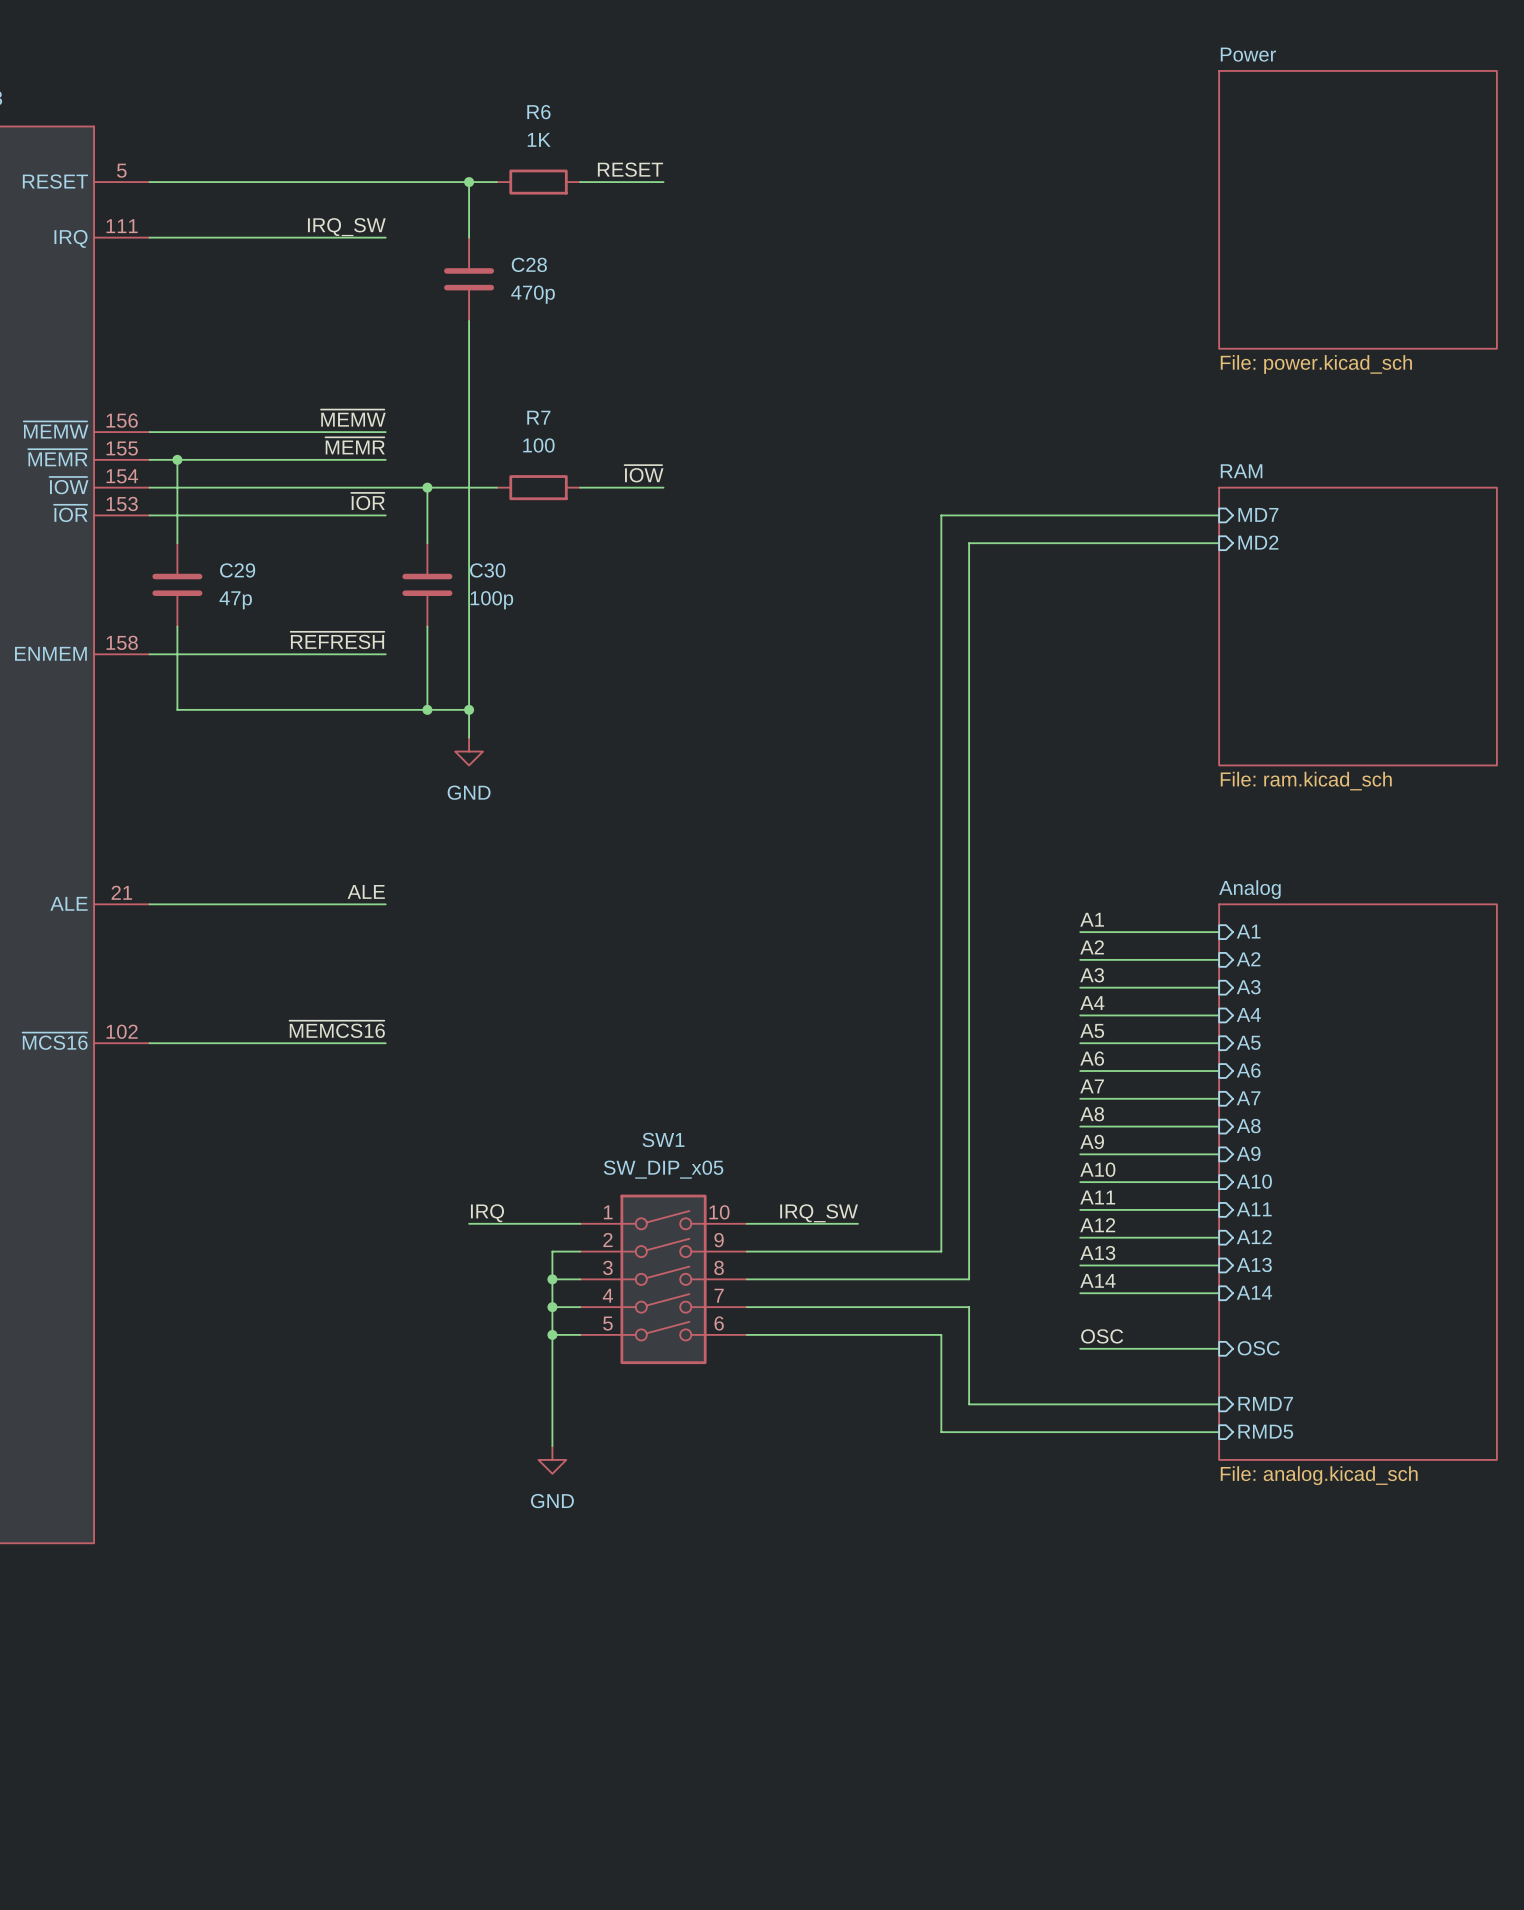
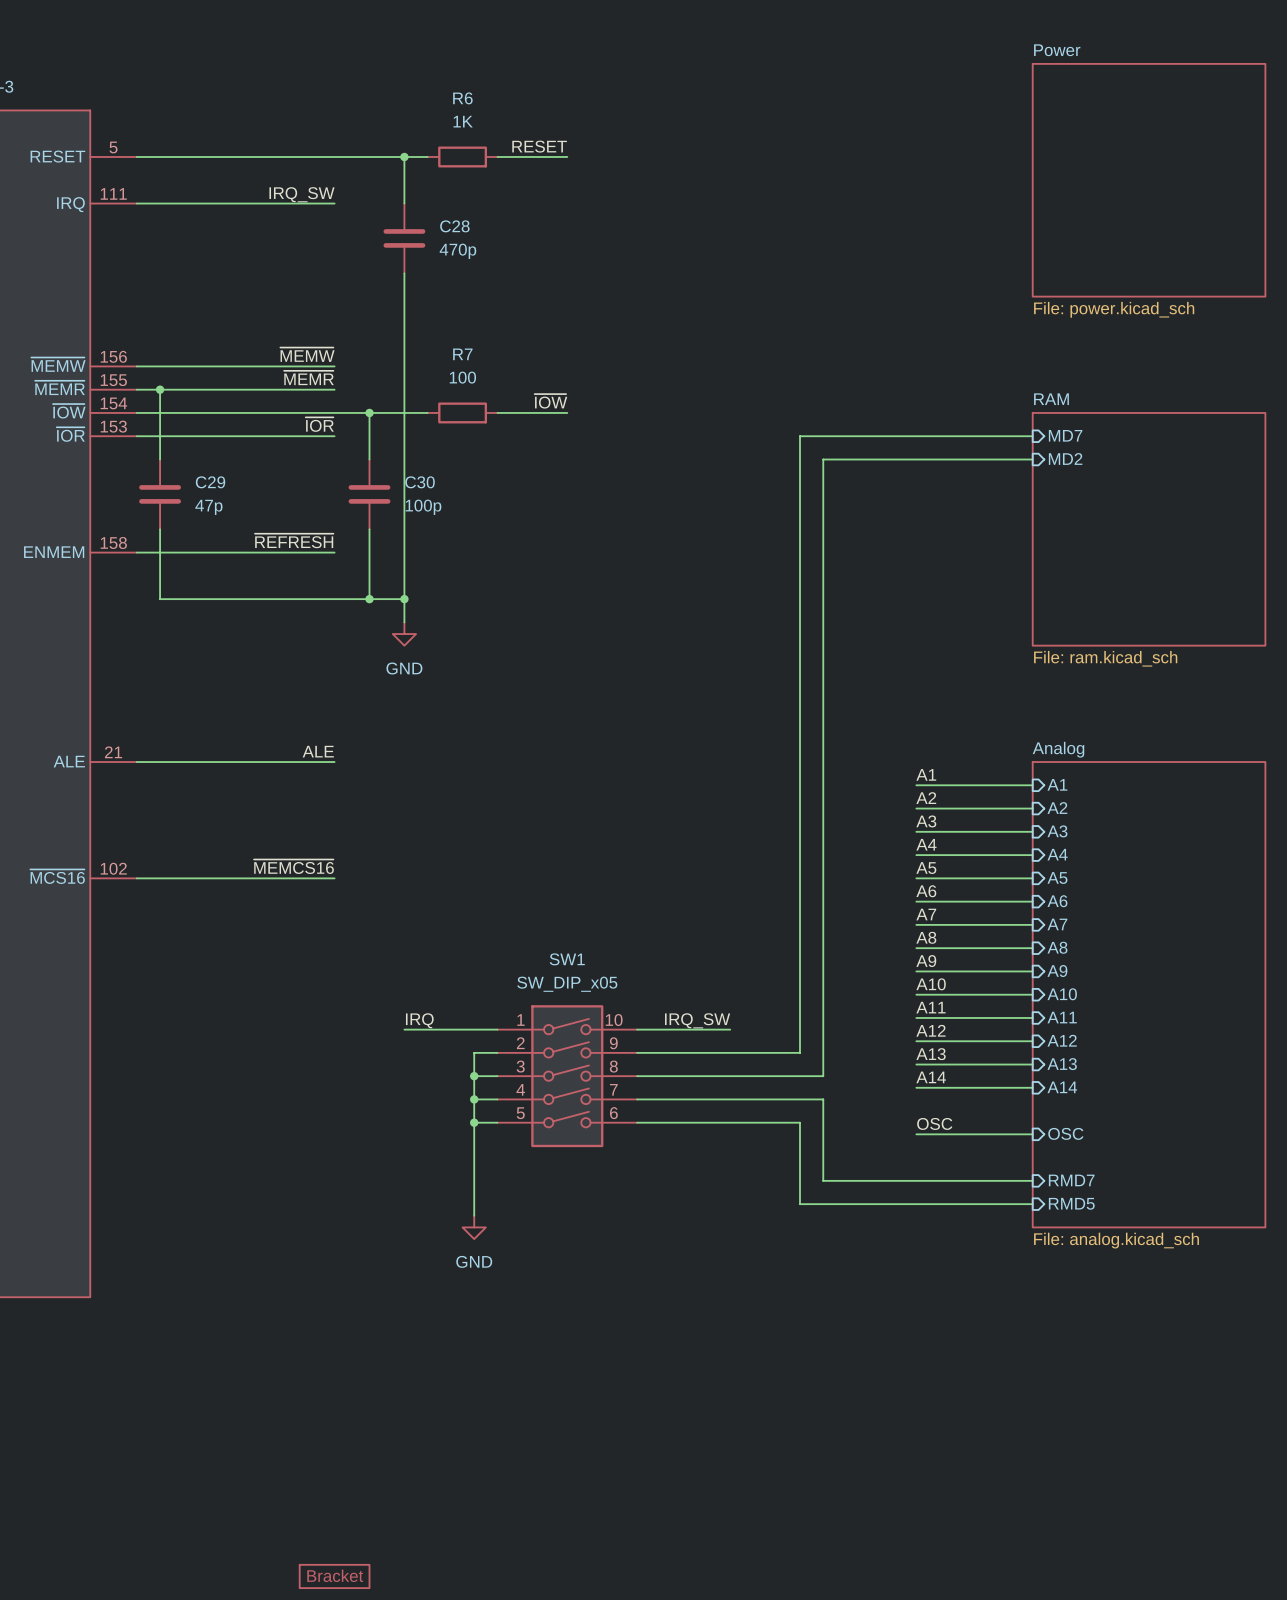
part: none -> (334, 1576)

